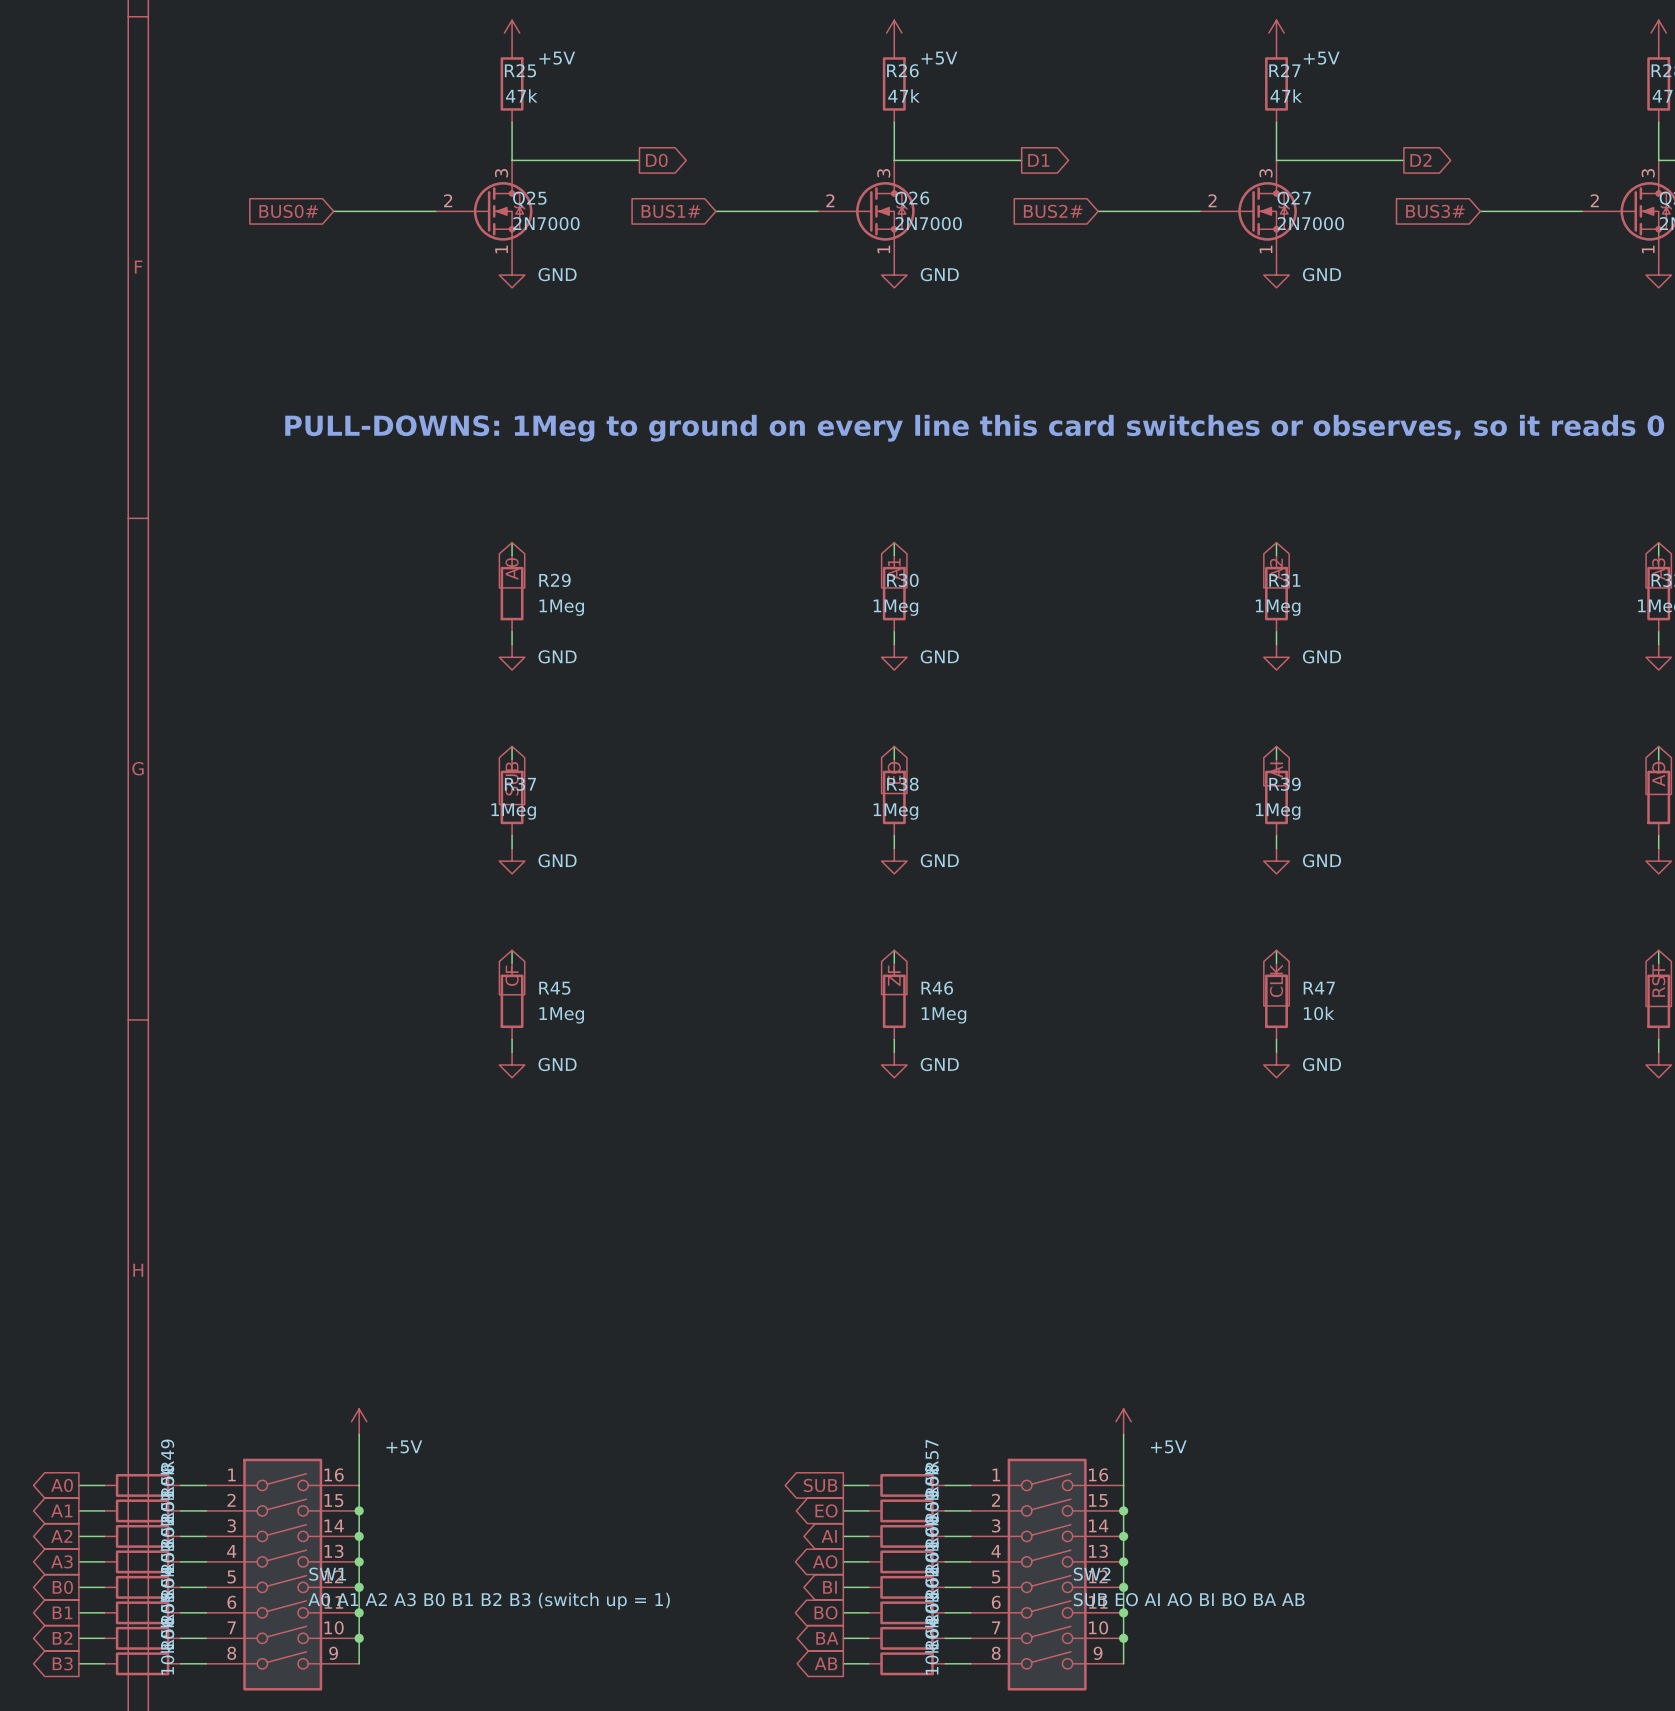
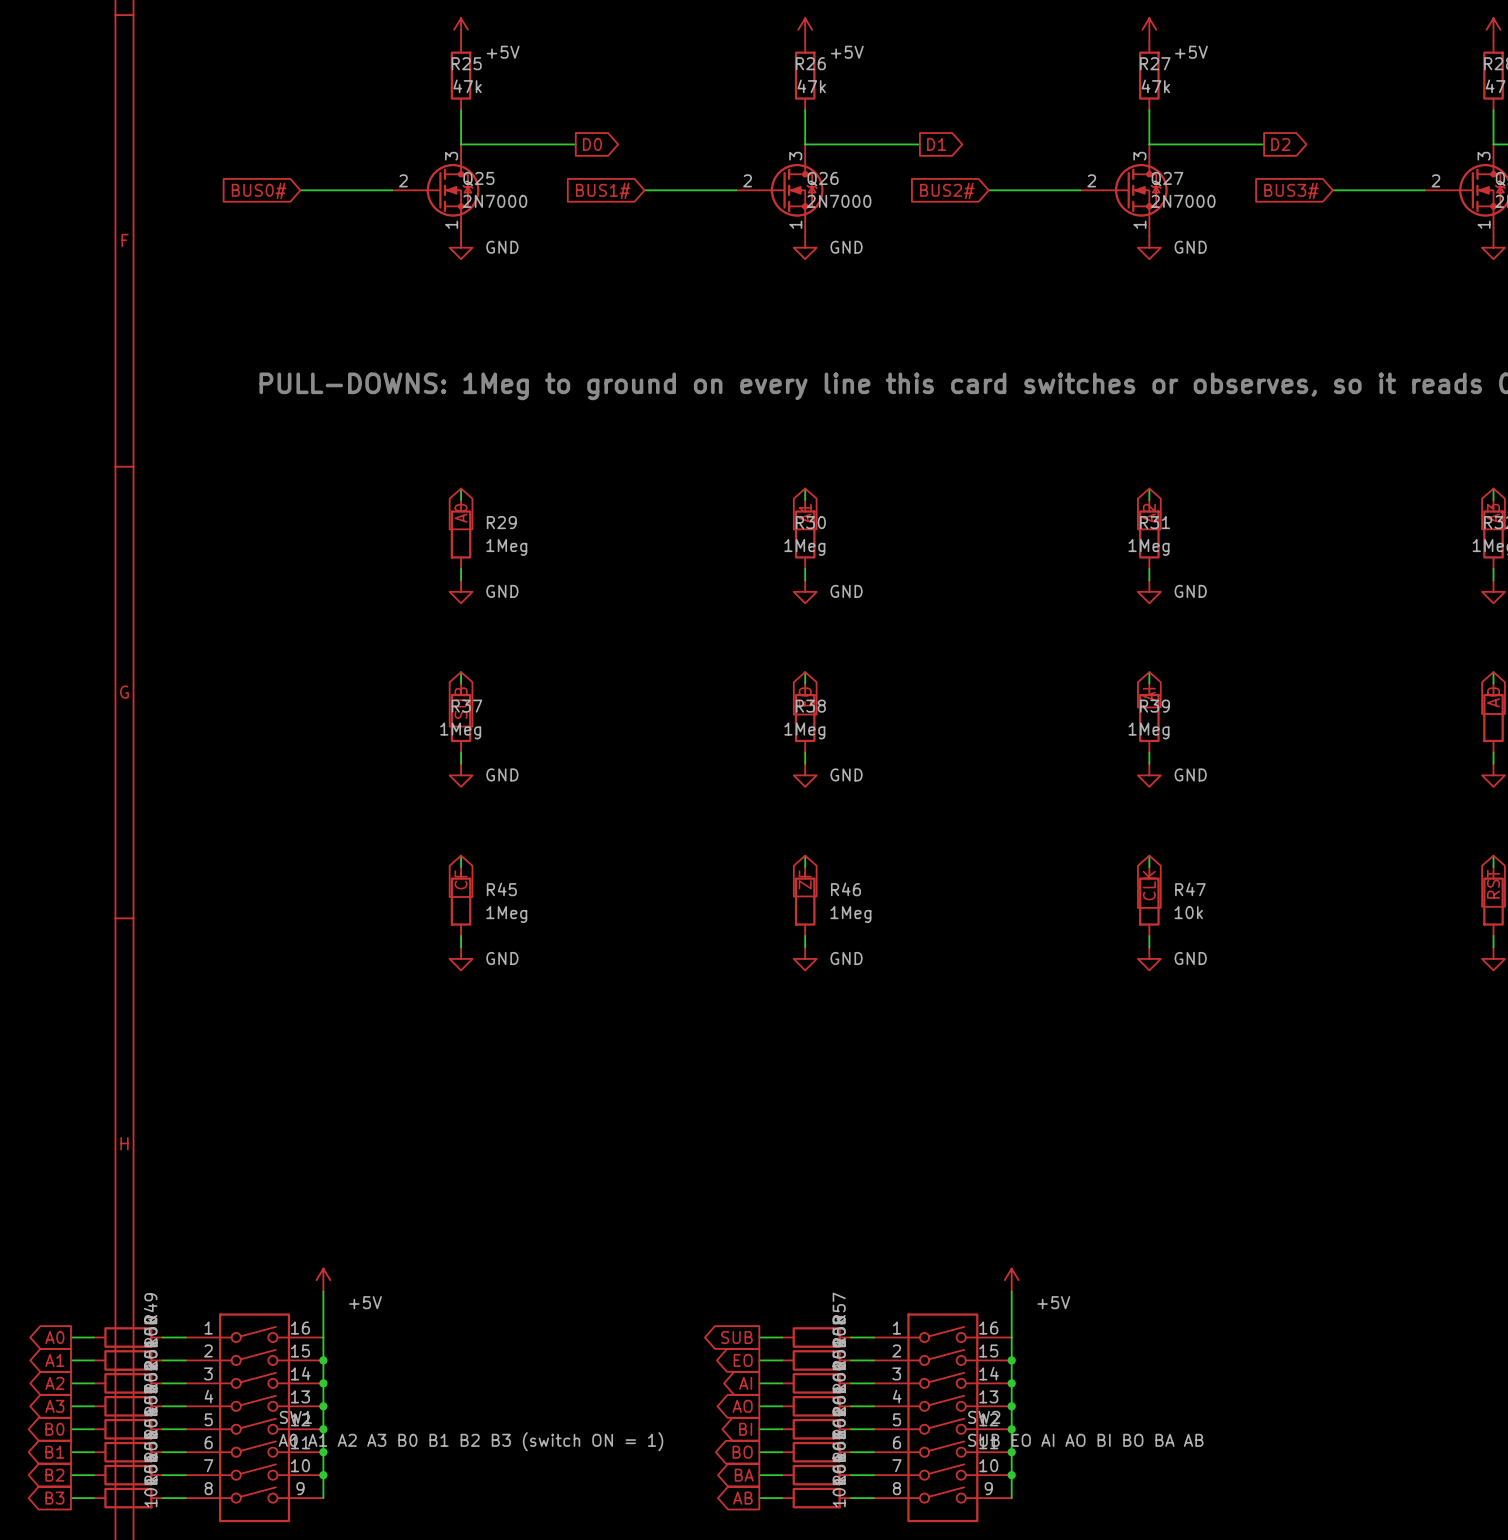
SW1 value: A0 A1 A2 A3 B0 B1 B2 B3 (switch up = 1) (489, 1601) -> A0 A1 A2 A3 B0 B1 B2 B3 (switch ON = 1) (470, 1441)

